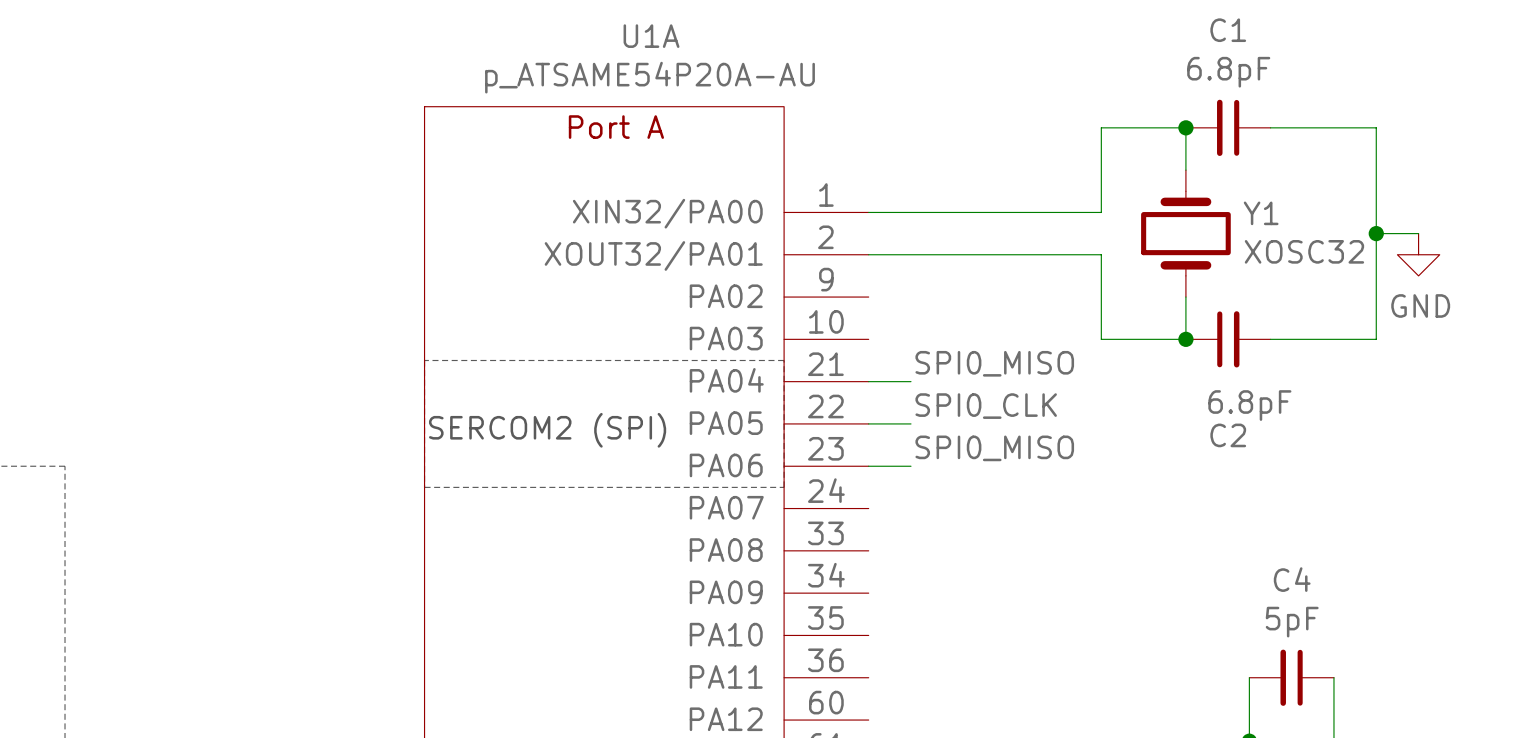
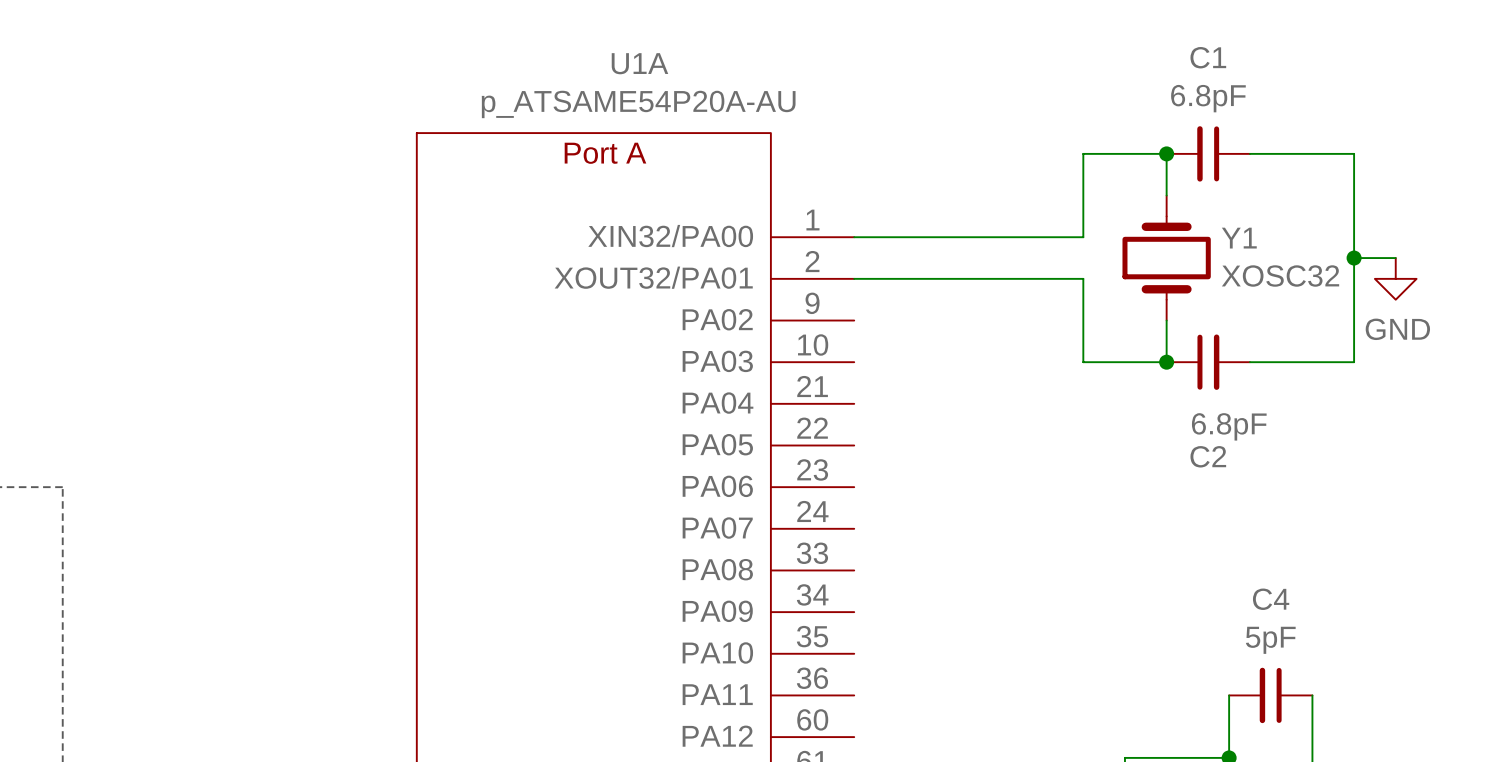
line: (424, 360) (784, 360) (784, 487) (424, 487) (424, 360) -> none
label: SPI0_MISO (994, 363) -> none
wire: (868, 381) (910, 381) -> none
label: SPI0_CLK (986, 406) -> none
wire: (868, 423) (910, 423) -> none
text: SERCOM2 (SPI) (547, 430) -> none
label: SPI0_MISO (994, 448) -> none
wire: (868, 466) (910, 466) -> none

